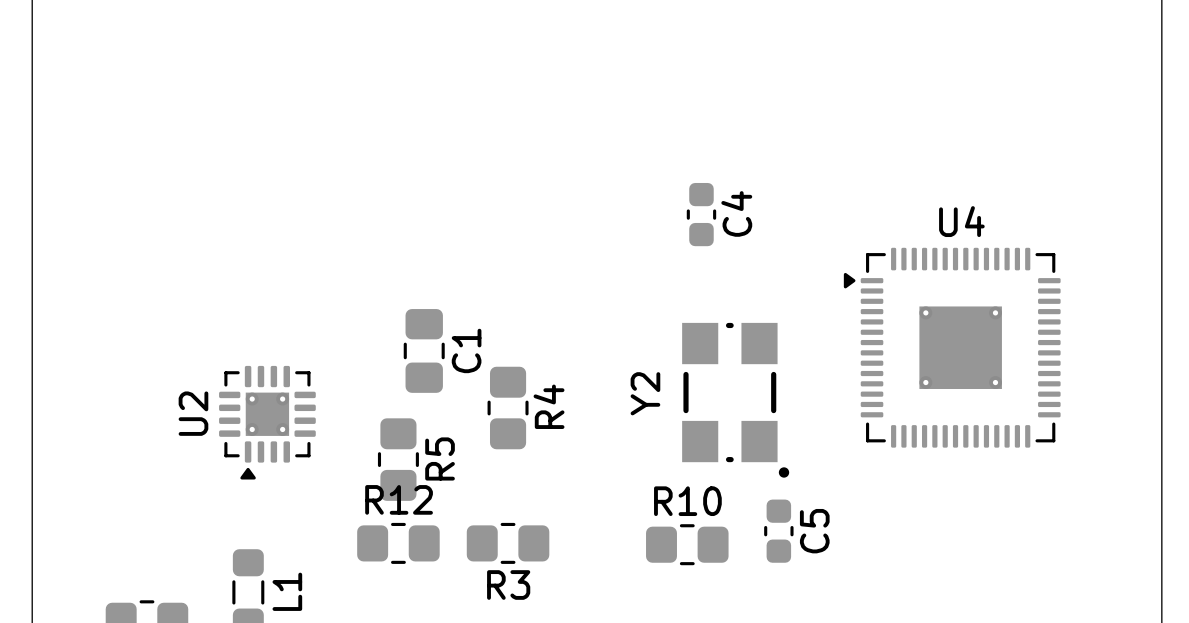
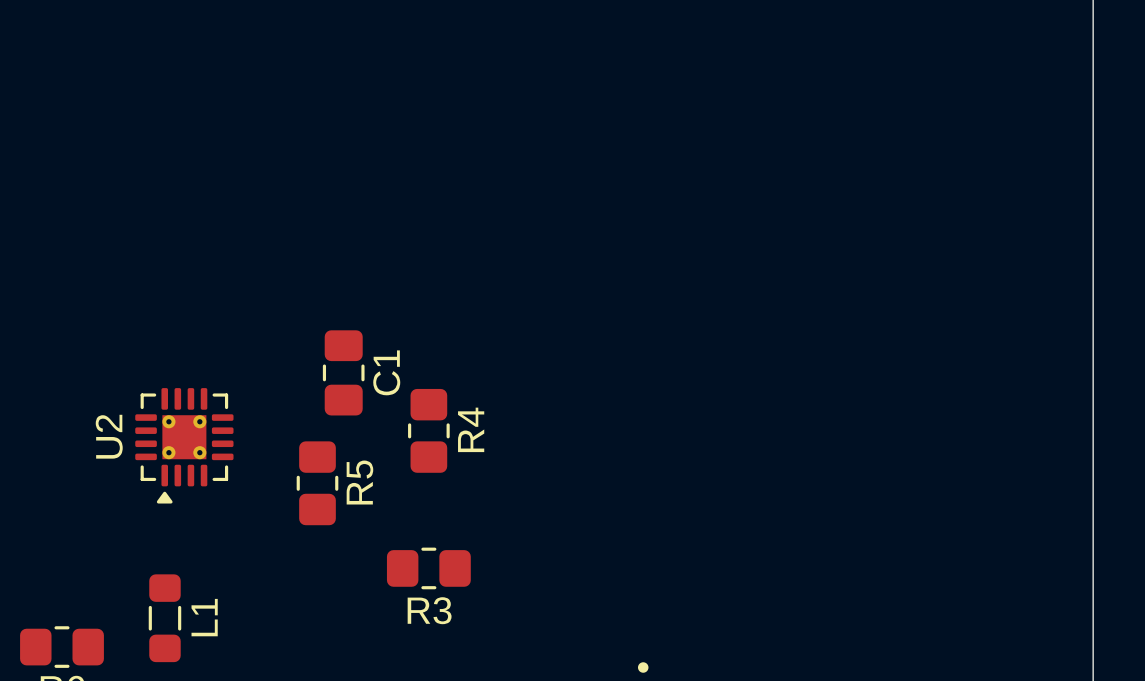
C4: (701, 214) -> none
U4: (952, 347) -> none
Y2: (735, 400) -> none
C5: (778, 531) -> none
R12: (398, 543) -> none
R10: (687, 544) -> none

